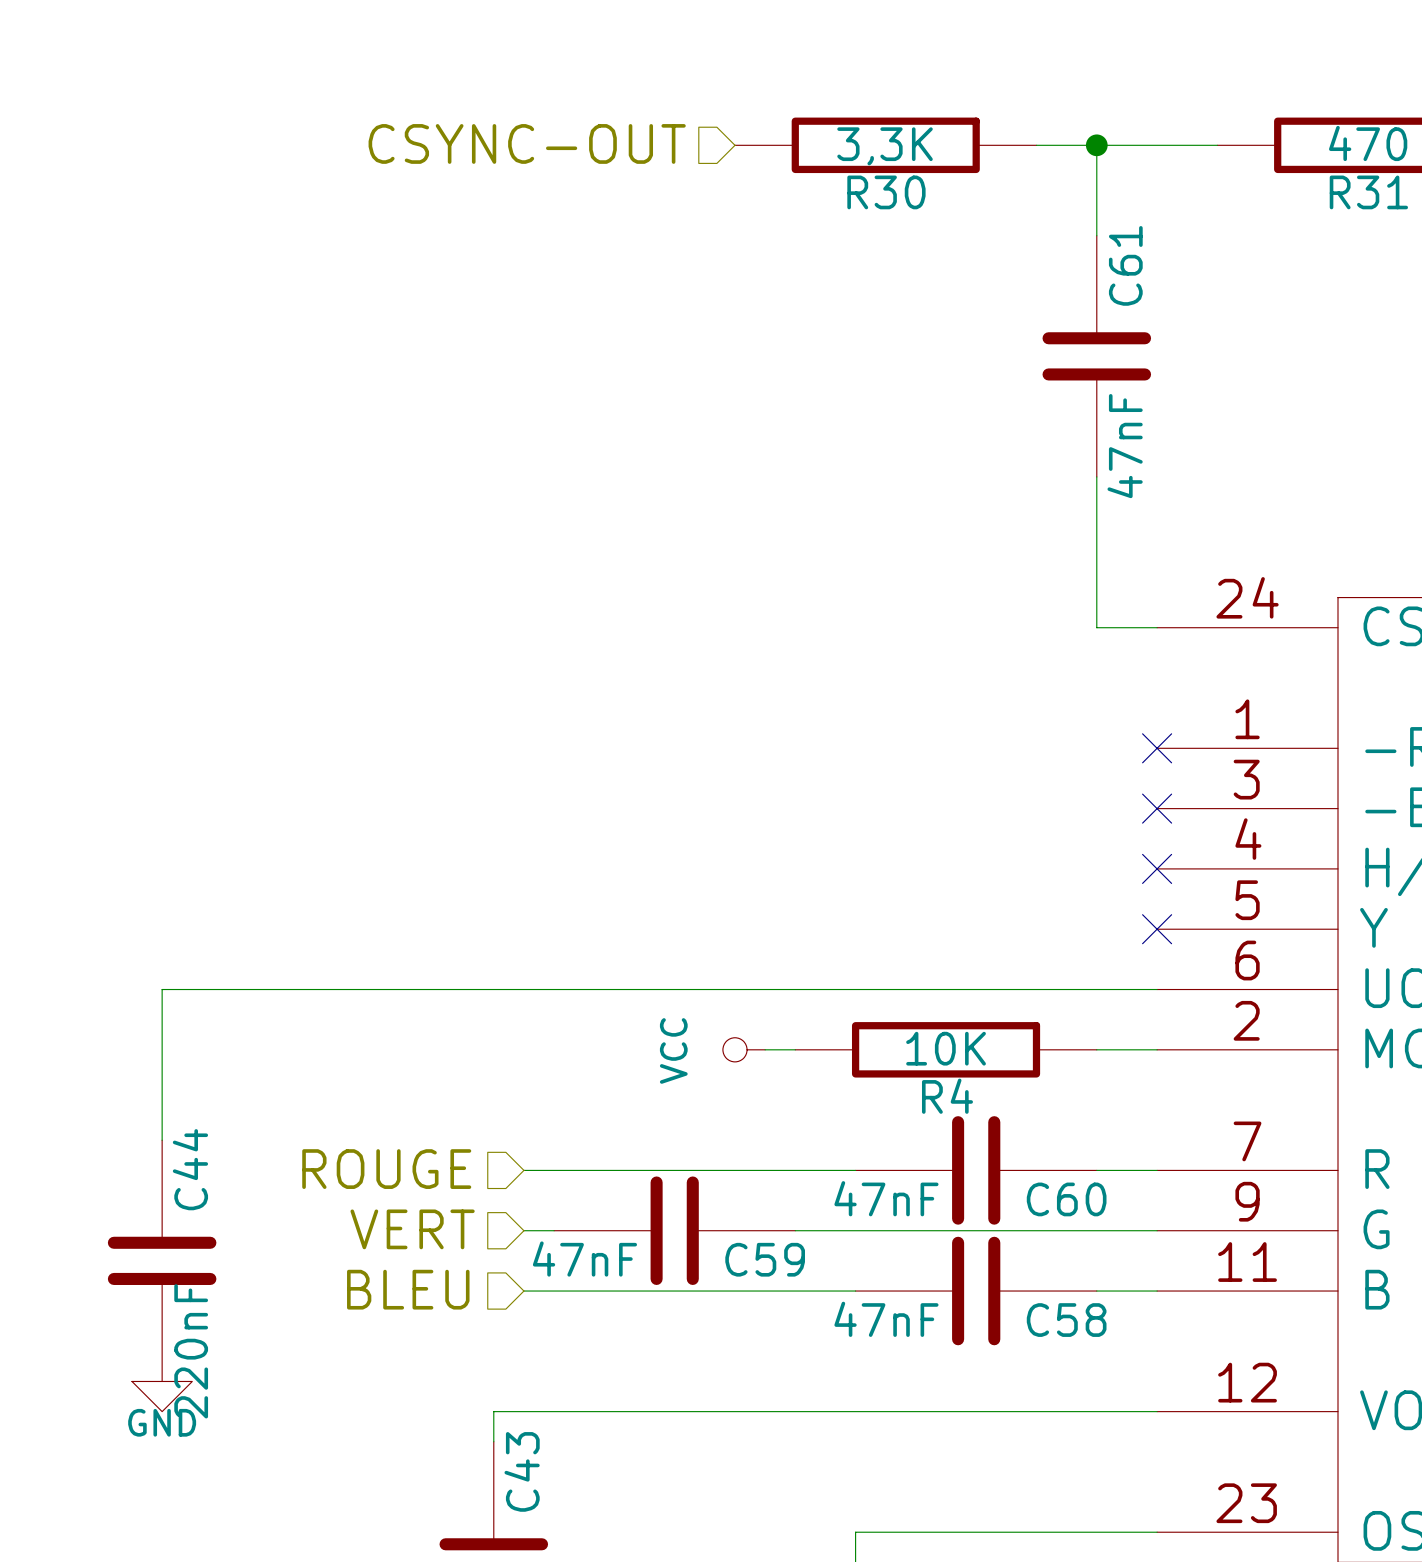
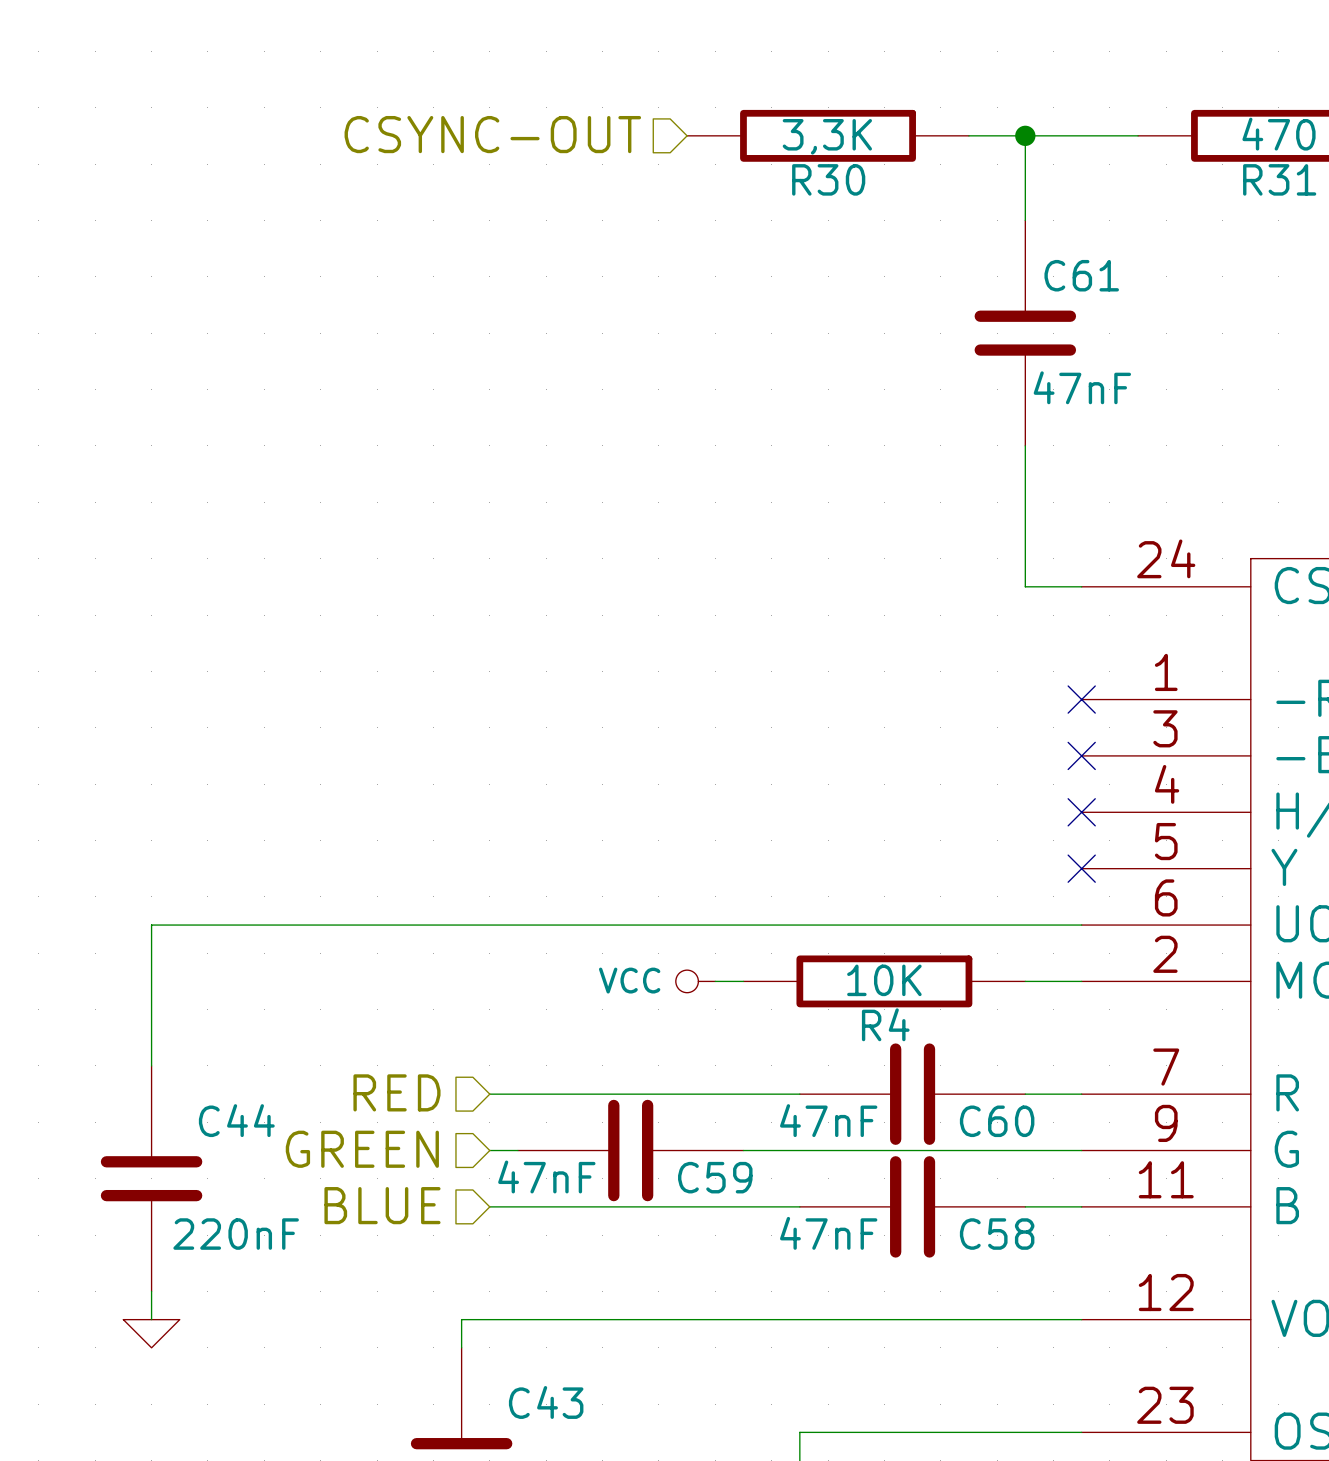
C61 name rotation: 0° (1125, 265) -> 90° clockwise (1081, 275)
C61 value rotation: 0° (1125, 446) -> 90° clockwise (1082, 387)
power symbol text rotation: 0° (673, 1050) -> 90° clockwise (629, 980)
C44 name rotation: 0° (190, 1169) -> 90° clockwise (236, 1120)
hierarchical label: ROUGE (386, 1169) -> RED (396, 1092)
hierarchical label: VERT (412, 1229) -> GREEN (362, 1149)
hierarchical label: BLEU (408, 1289) -> BLUE (382, 1205)
C44 value rotation: 0° (191, 1351) -> 90° clockwise (236, 1234)
wire: none -> (151, 1291) (151, 1319)
power symbol: GND (162, 1396) -> none
power symbol: none -> (151, 1333)
C43 name rotation: 0° (522, 1471) -> 90° clockwise (546, 1402)

